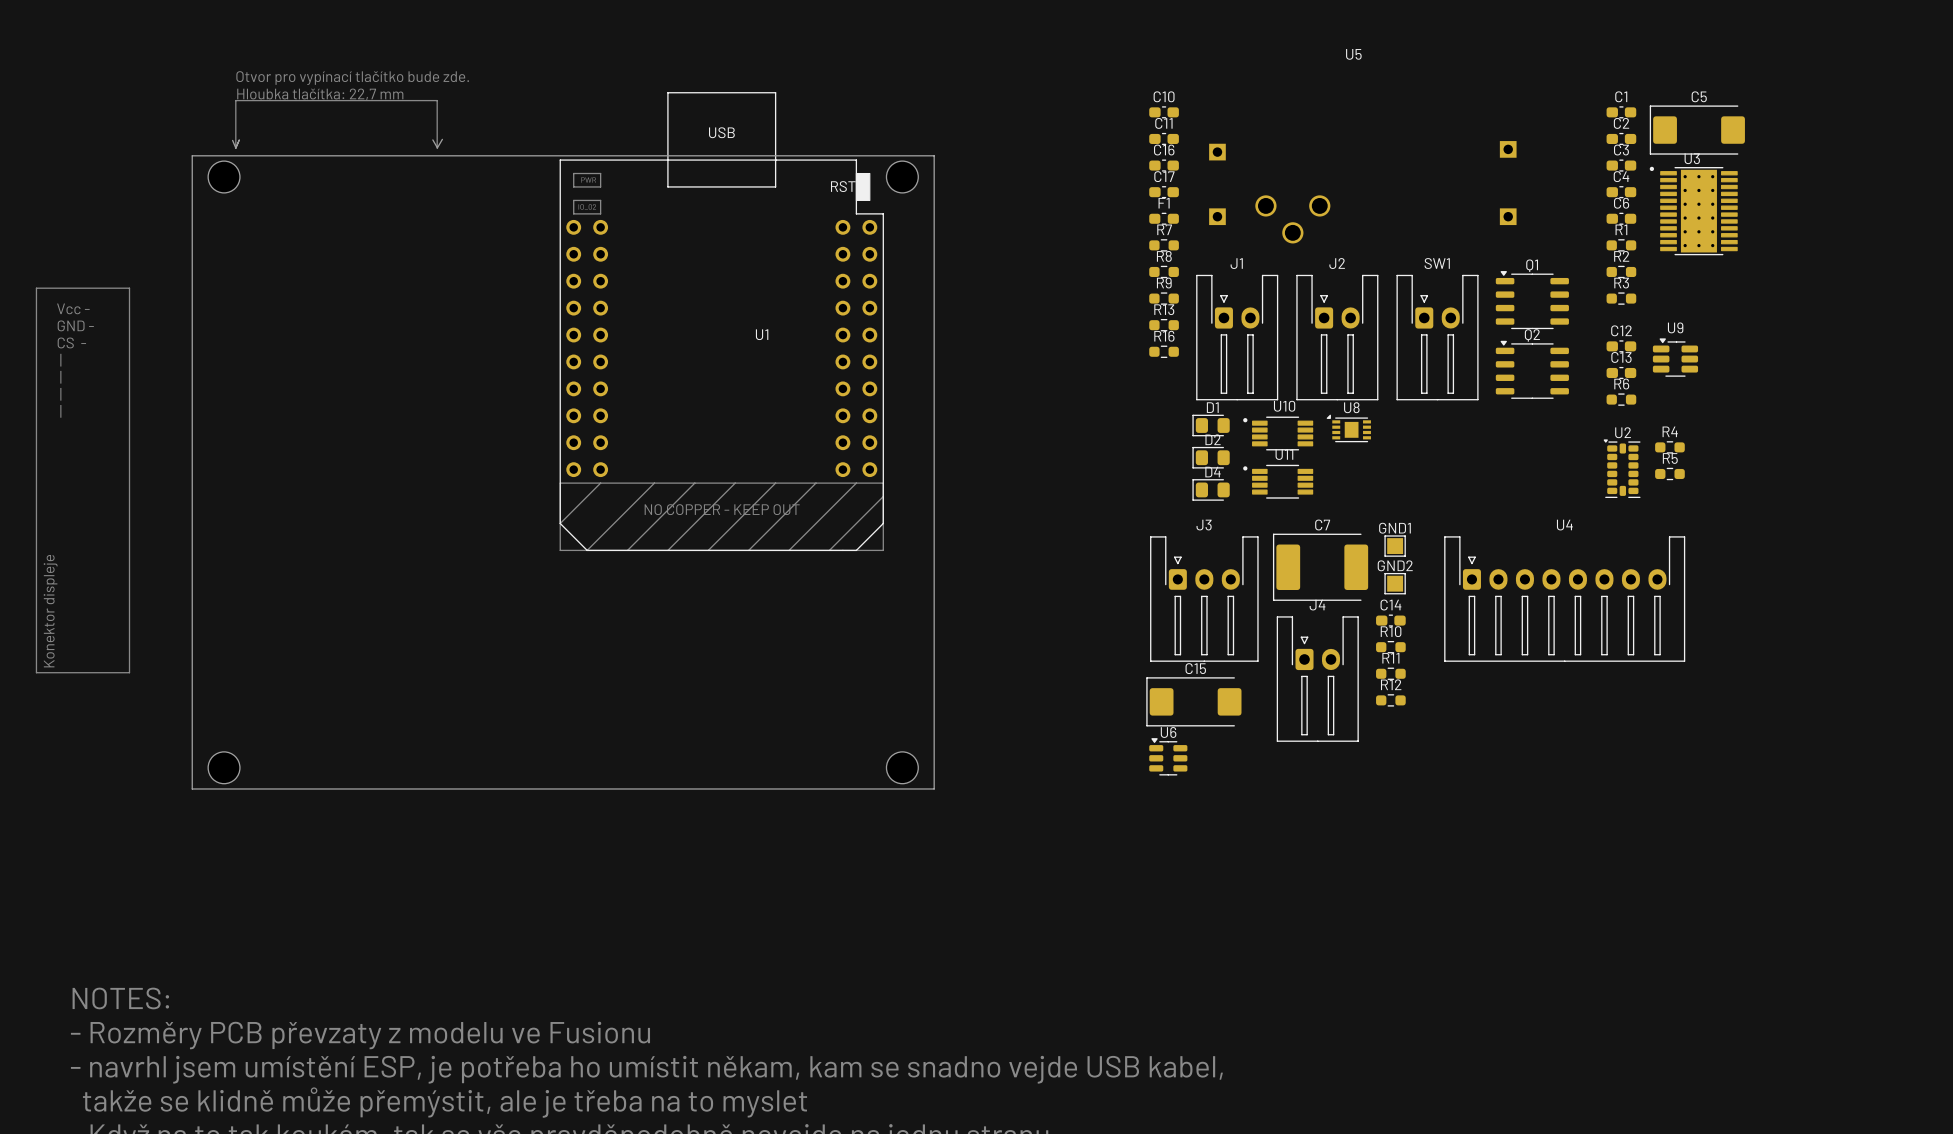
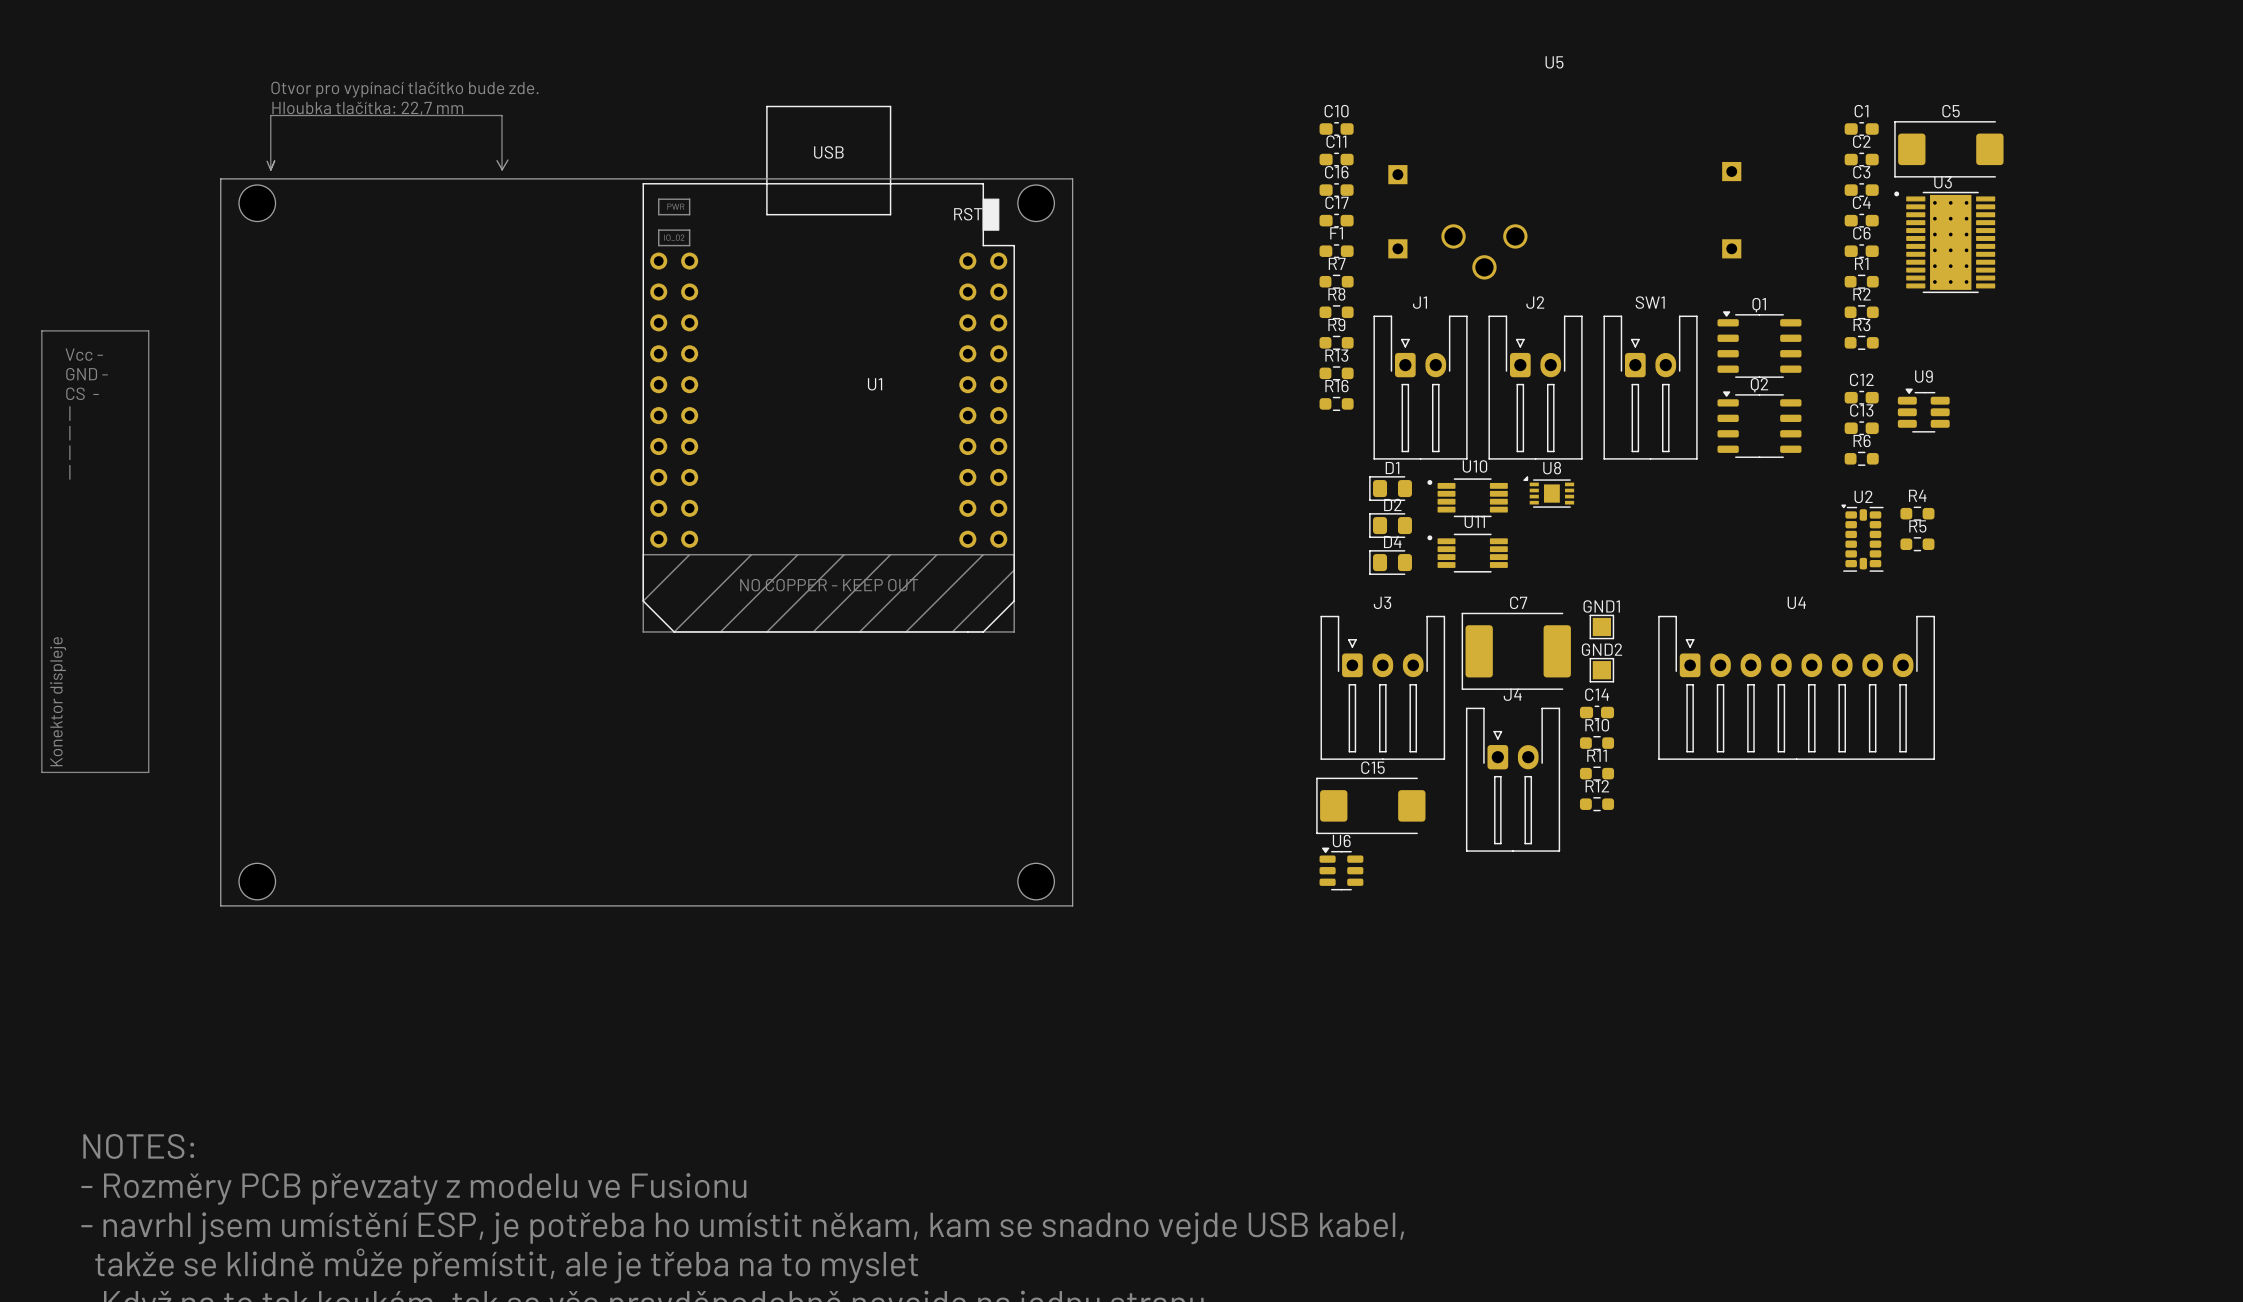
text: takže se klidně může přemýstit, ale je třeba na to myslet (445, 1102) -> takže se klidně může přemístit, ale je třeba na to myslet (506, 1265)

